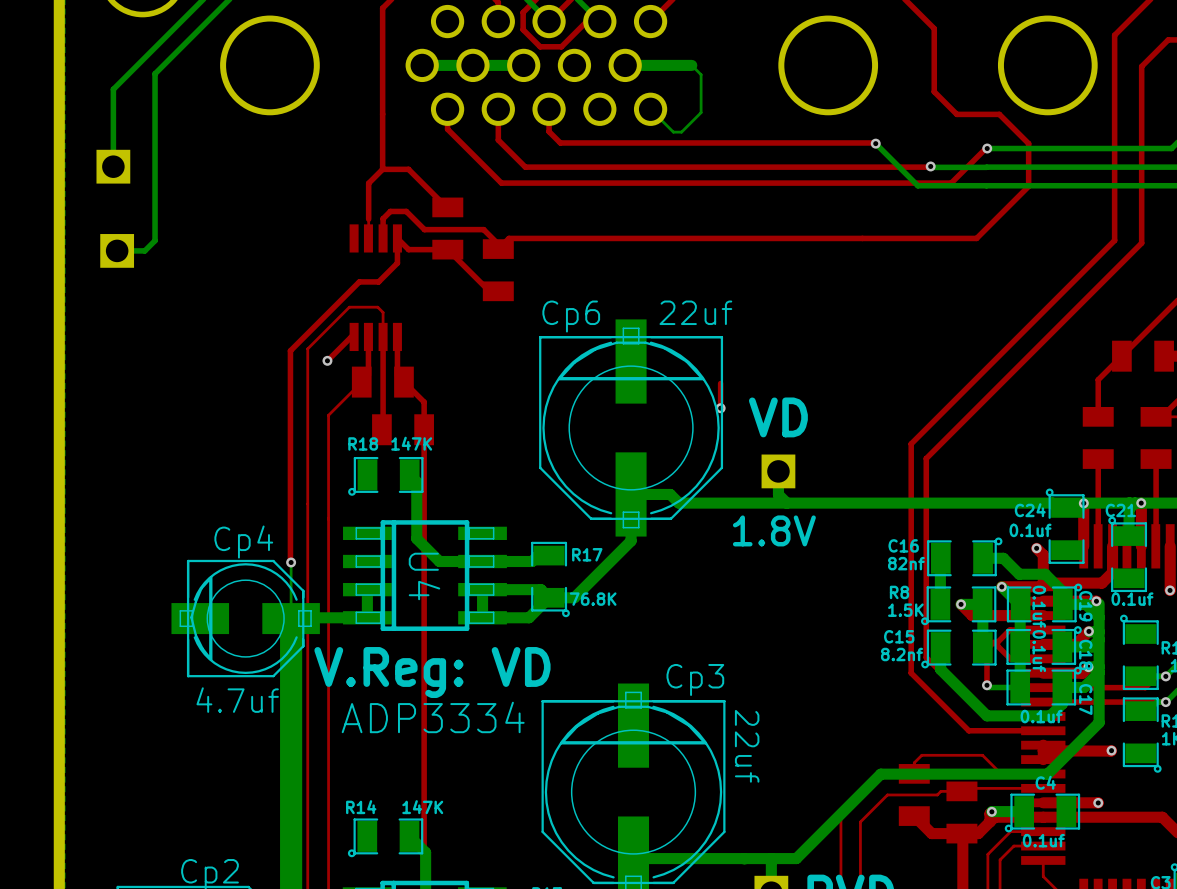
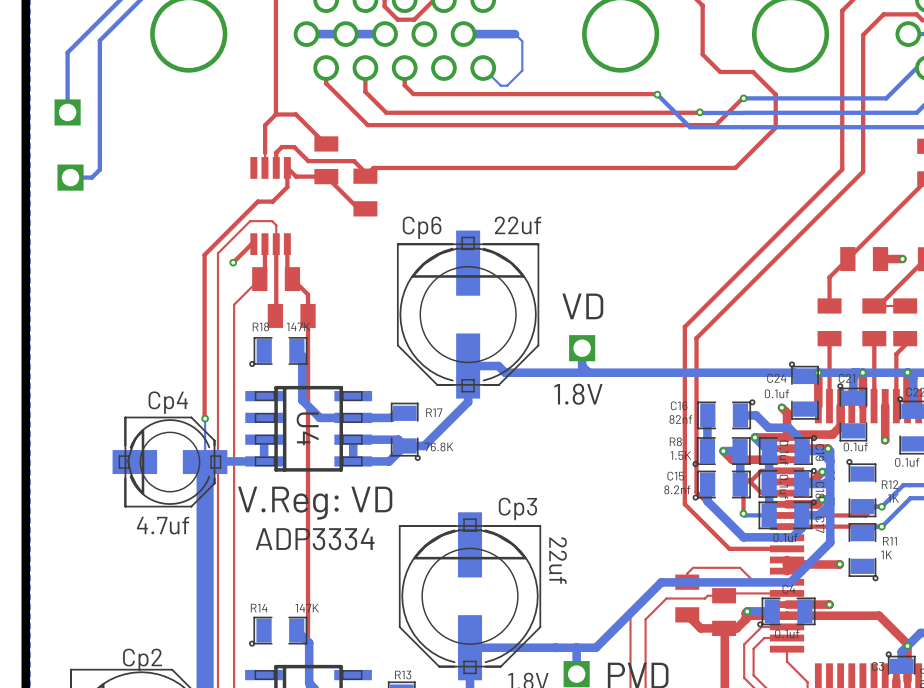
top track: (720, 383) (720, 408) -> none
via: (720, 408) -> none

